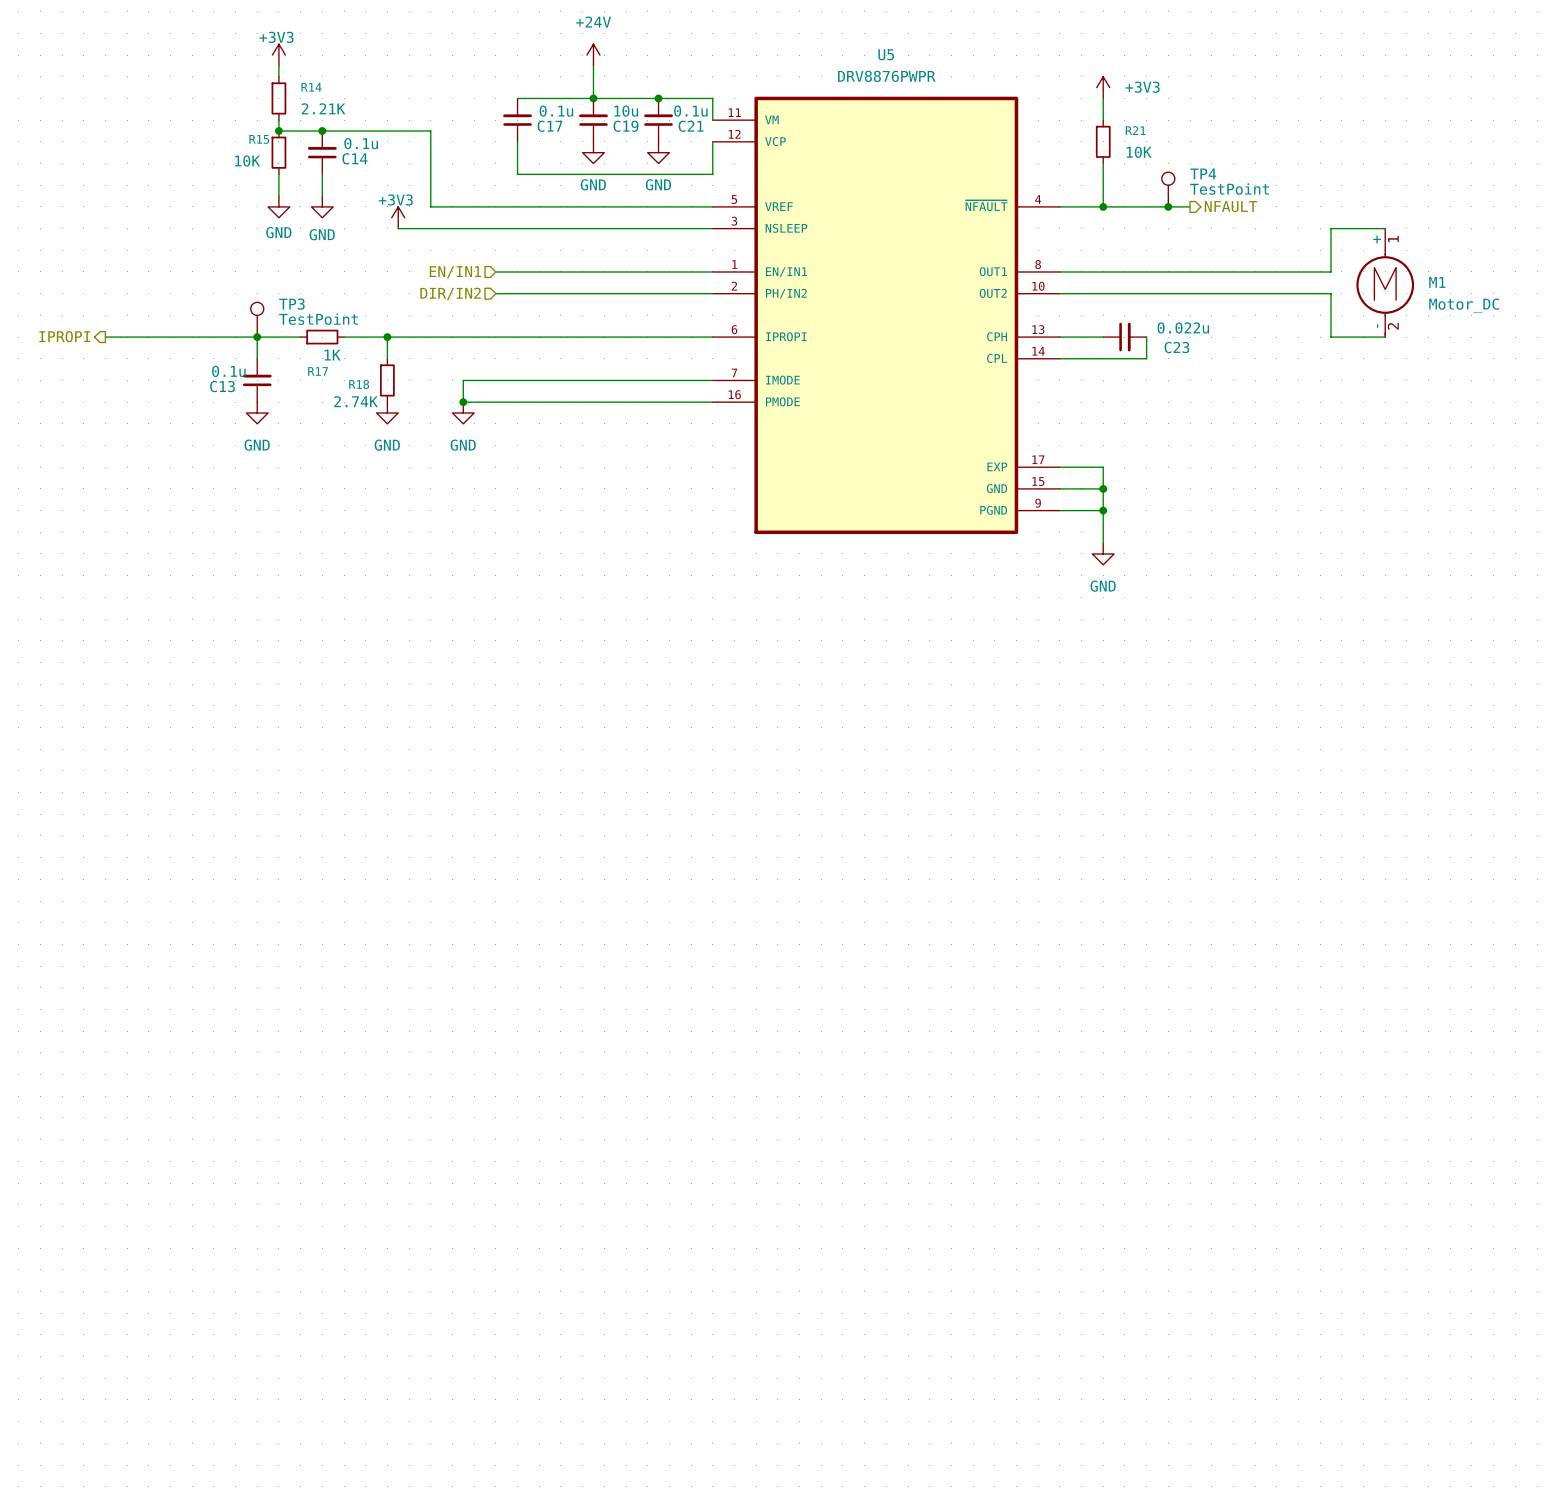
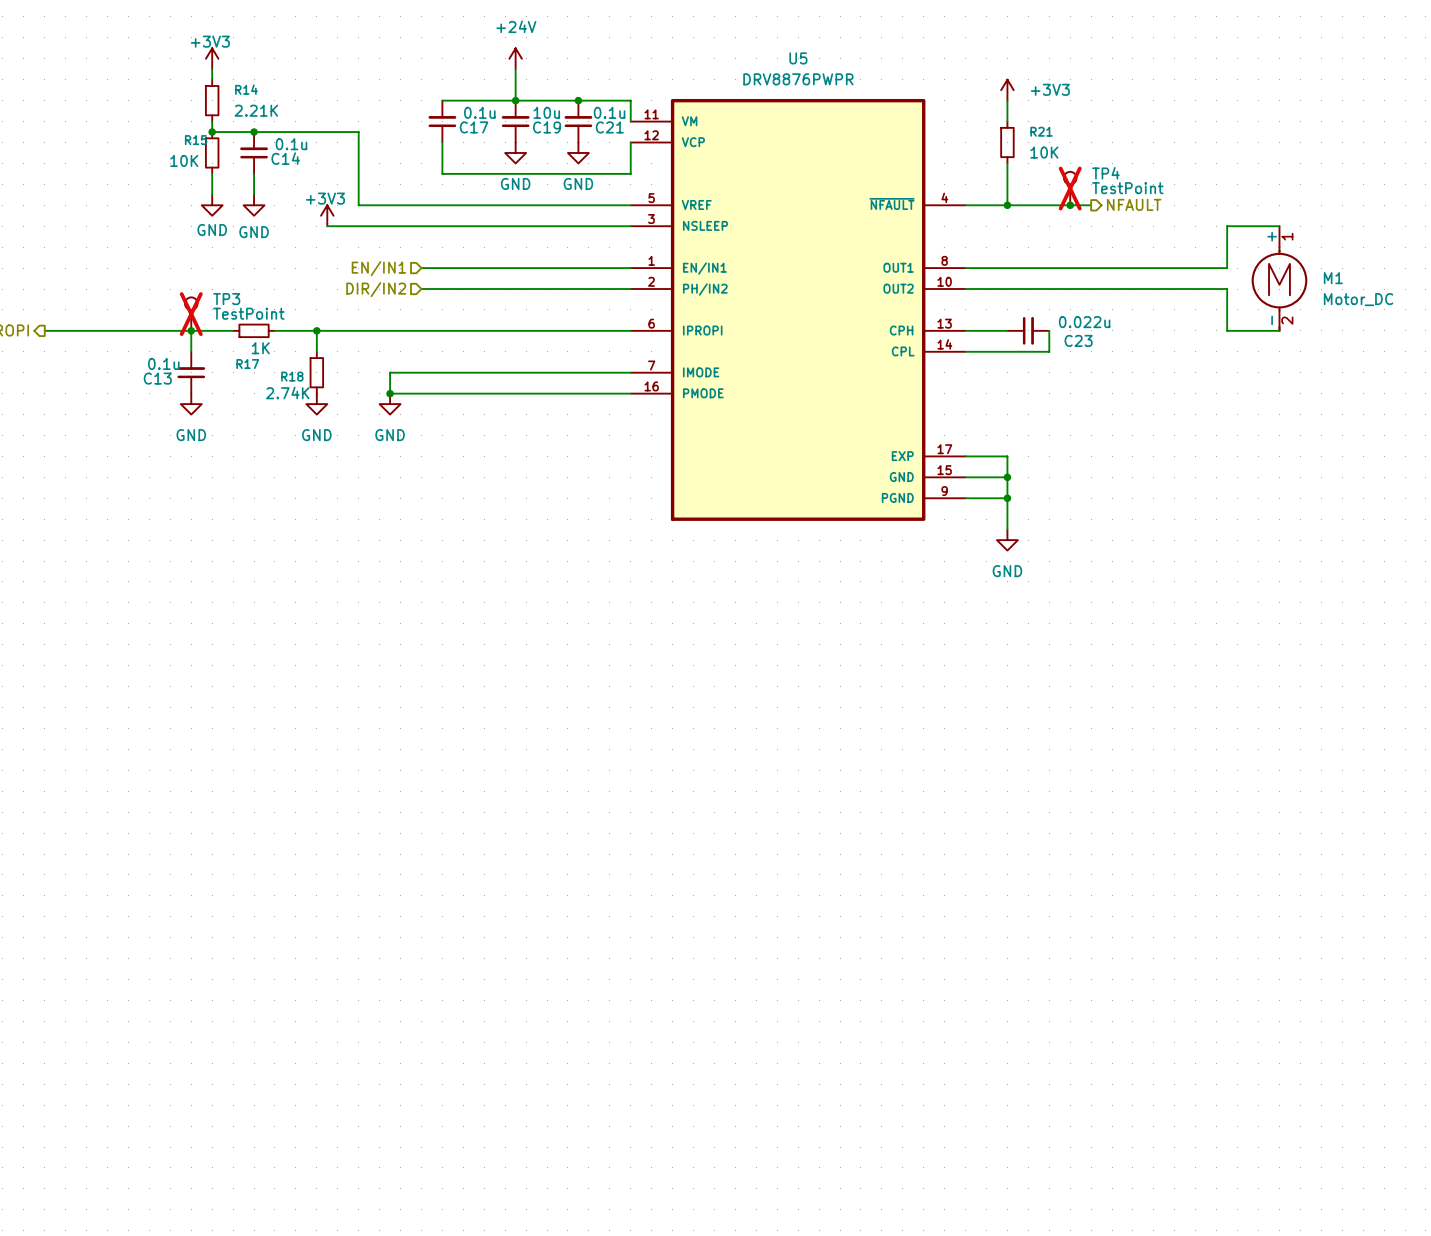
TP4 do-not-place cross: none -> (1070, 188)
TP3 do-not-place cross: none -> (191, 314)

